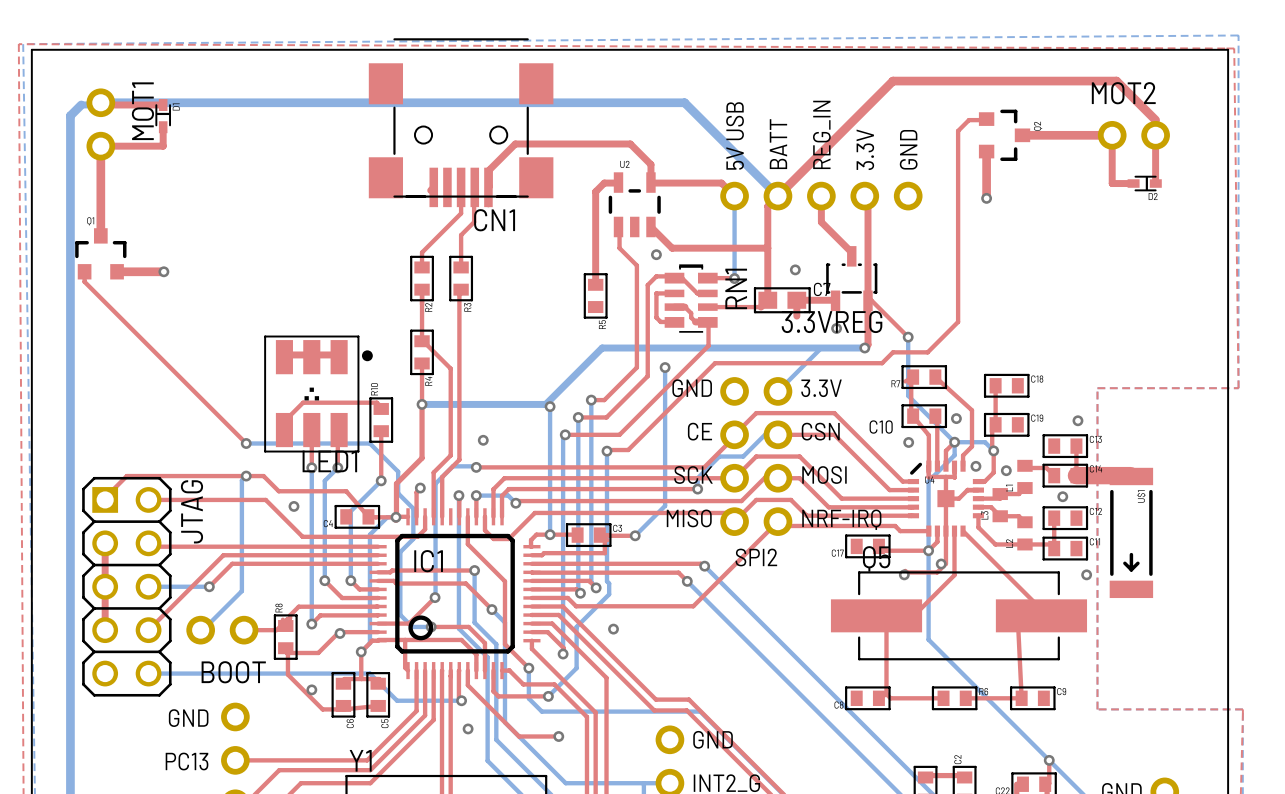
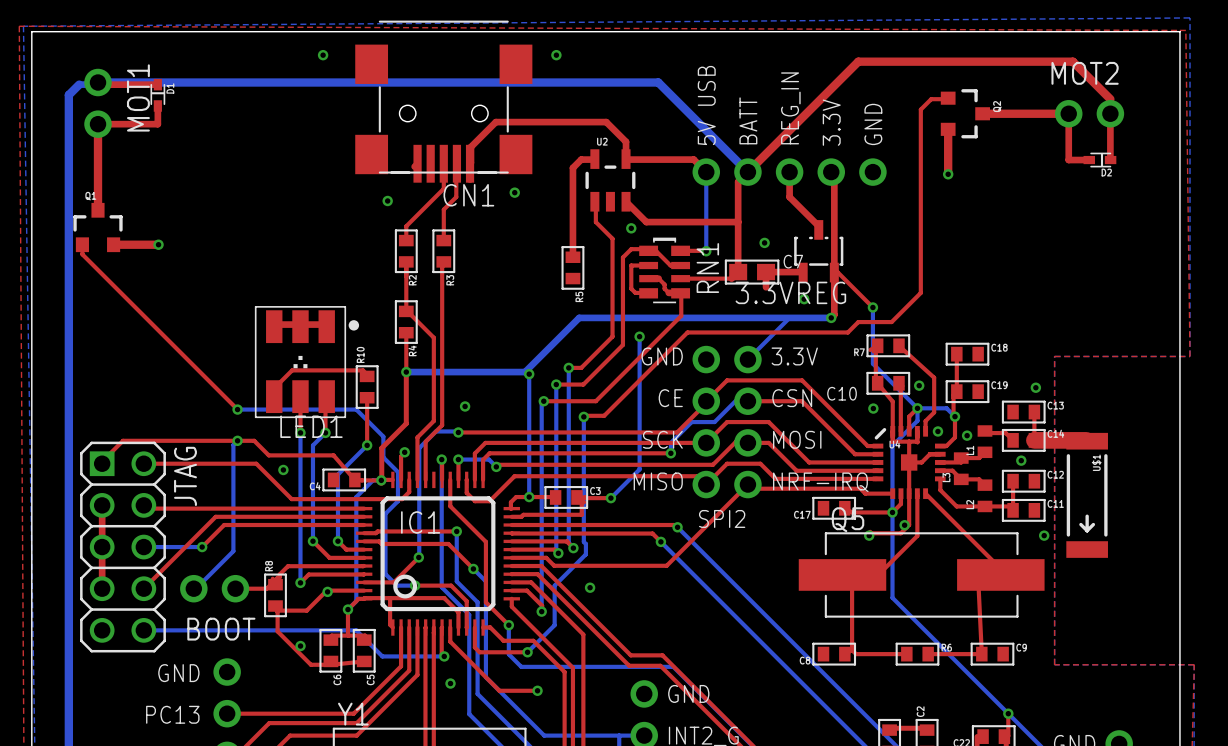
via: none -> (323, 55)
via: none -> (556, 55)
via: none -> (514, 192)
via: none -> (387, 200)

